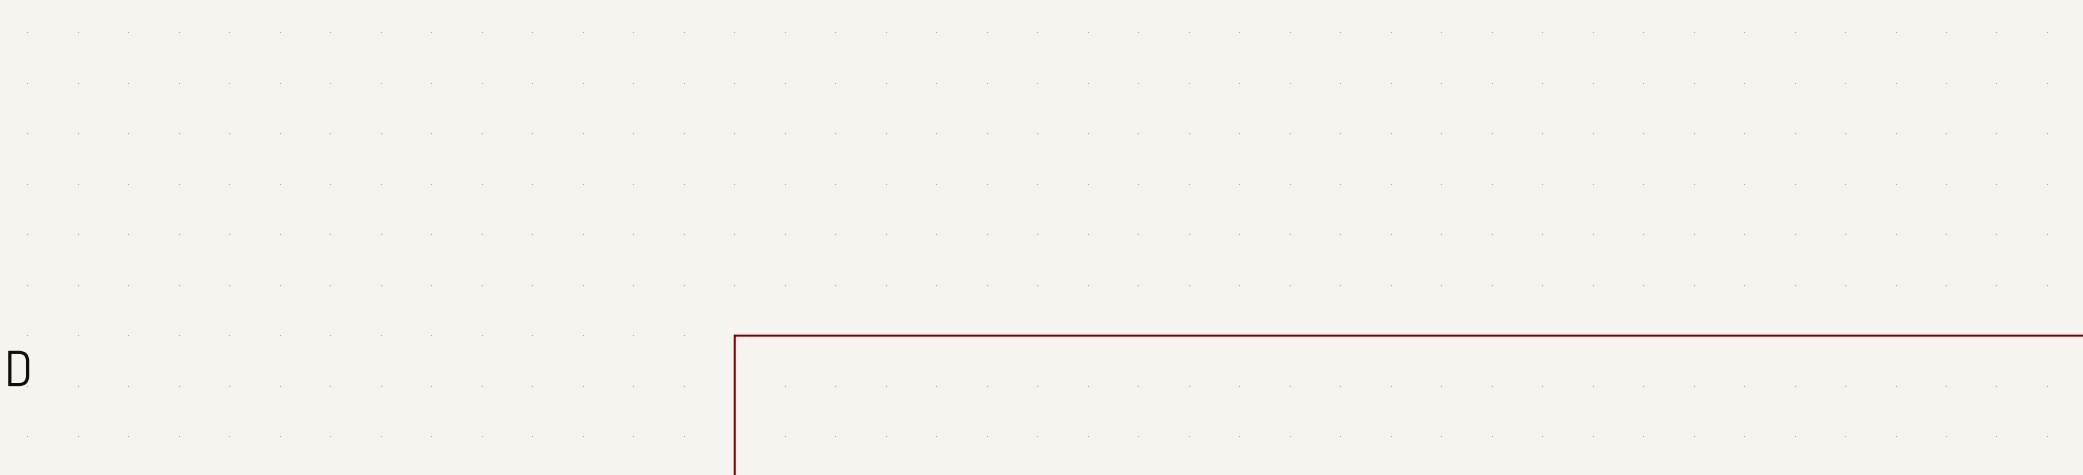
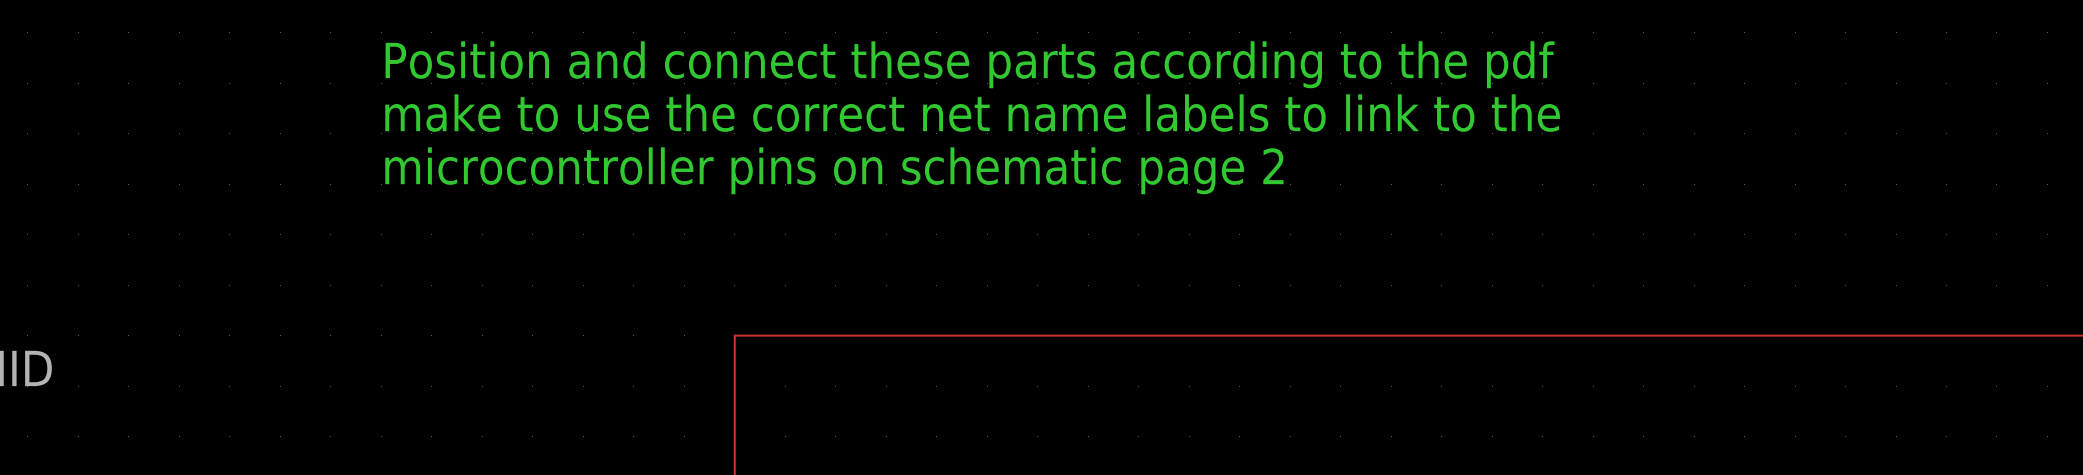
text: none -> Position and connect these parts according to the pdf (970, 64)
text: none -> make to use the correct net name labels to link to the (972, 113)
text: none -> microcontroller pins on schematic page 2 (834, 170)

